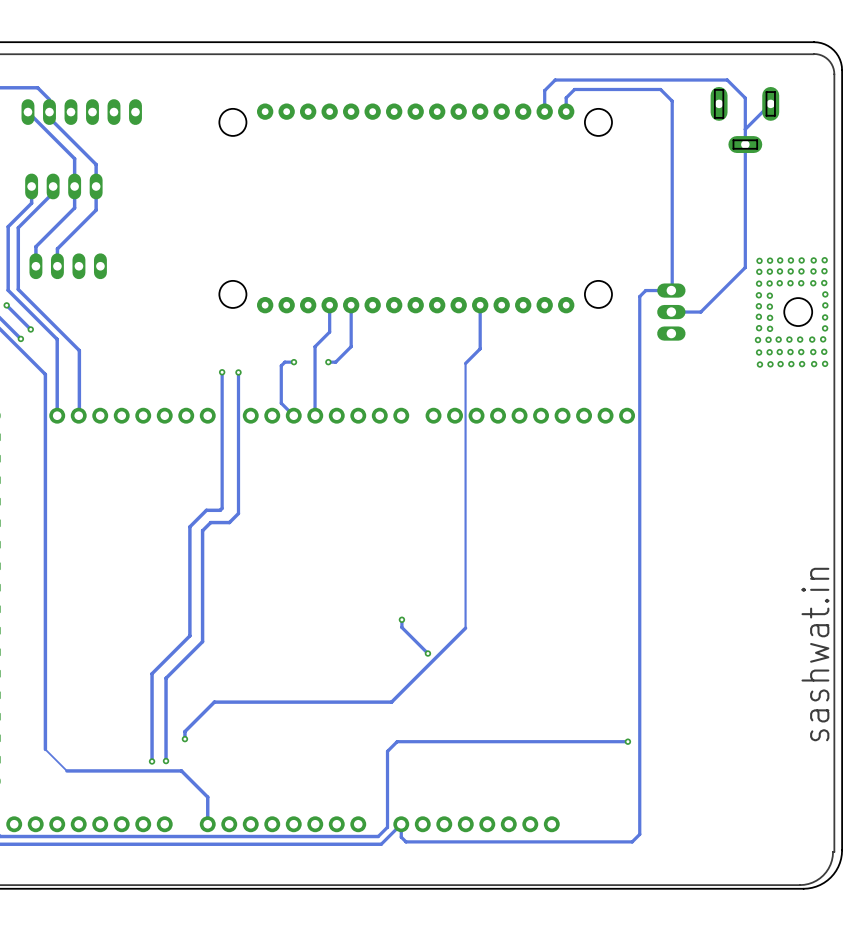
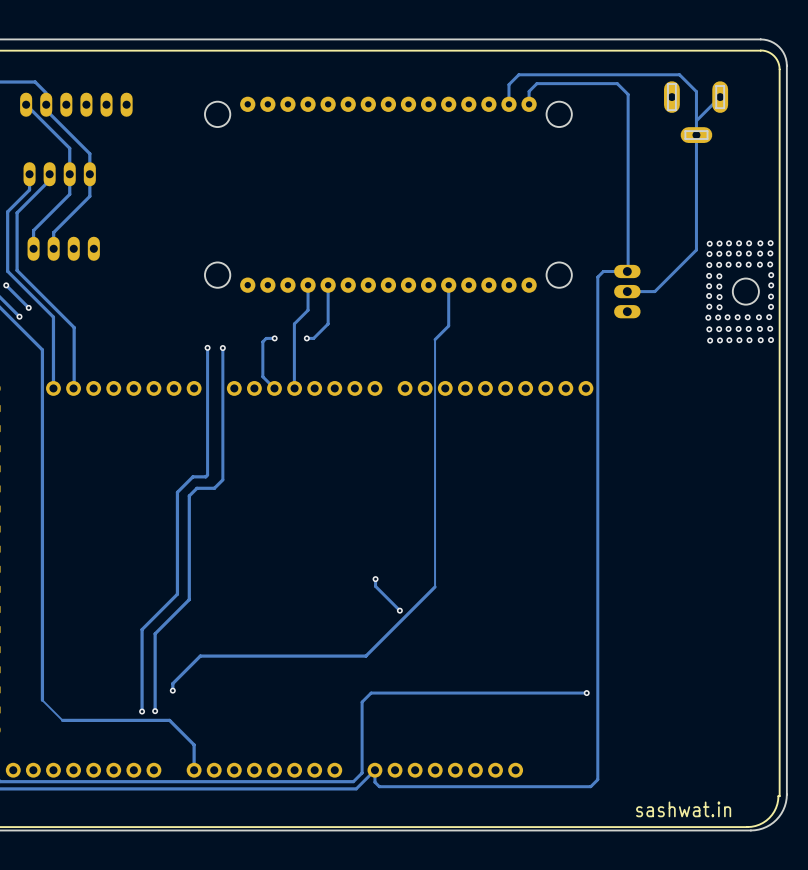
text: sashwat.in (815, 654) -> none
text: none -> sashwat.in (683, 809)

